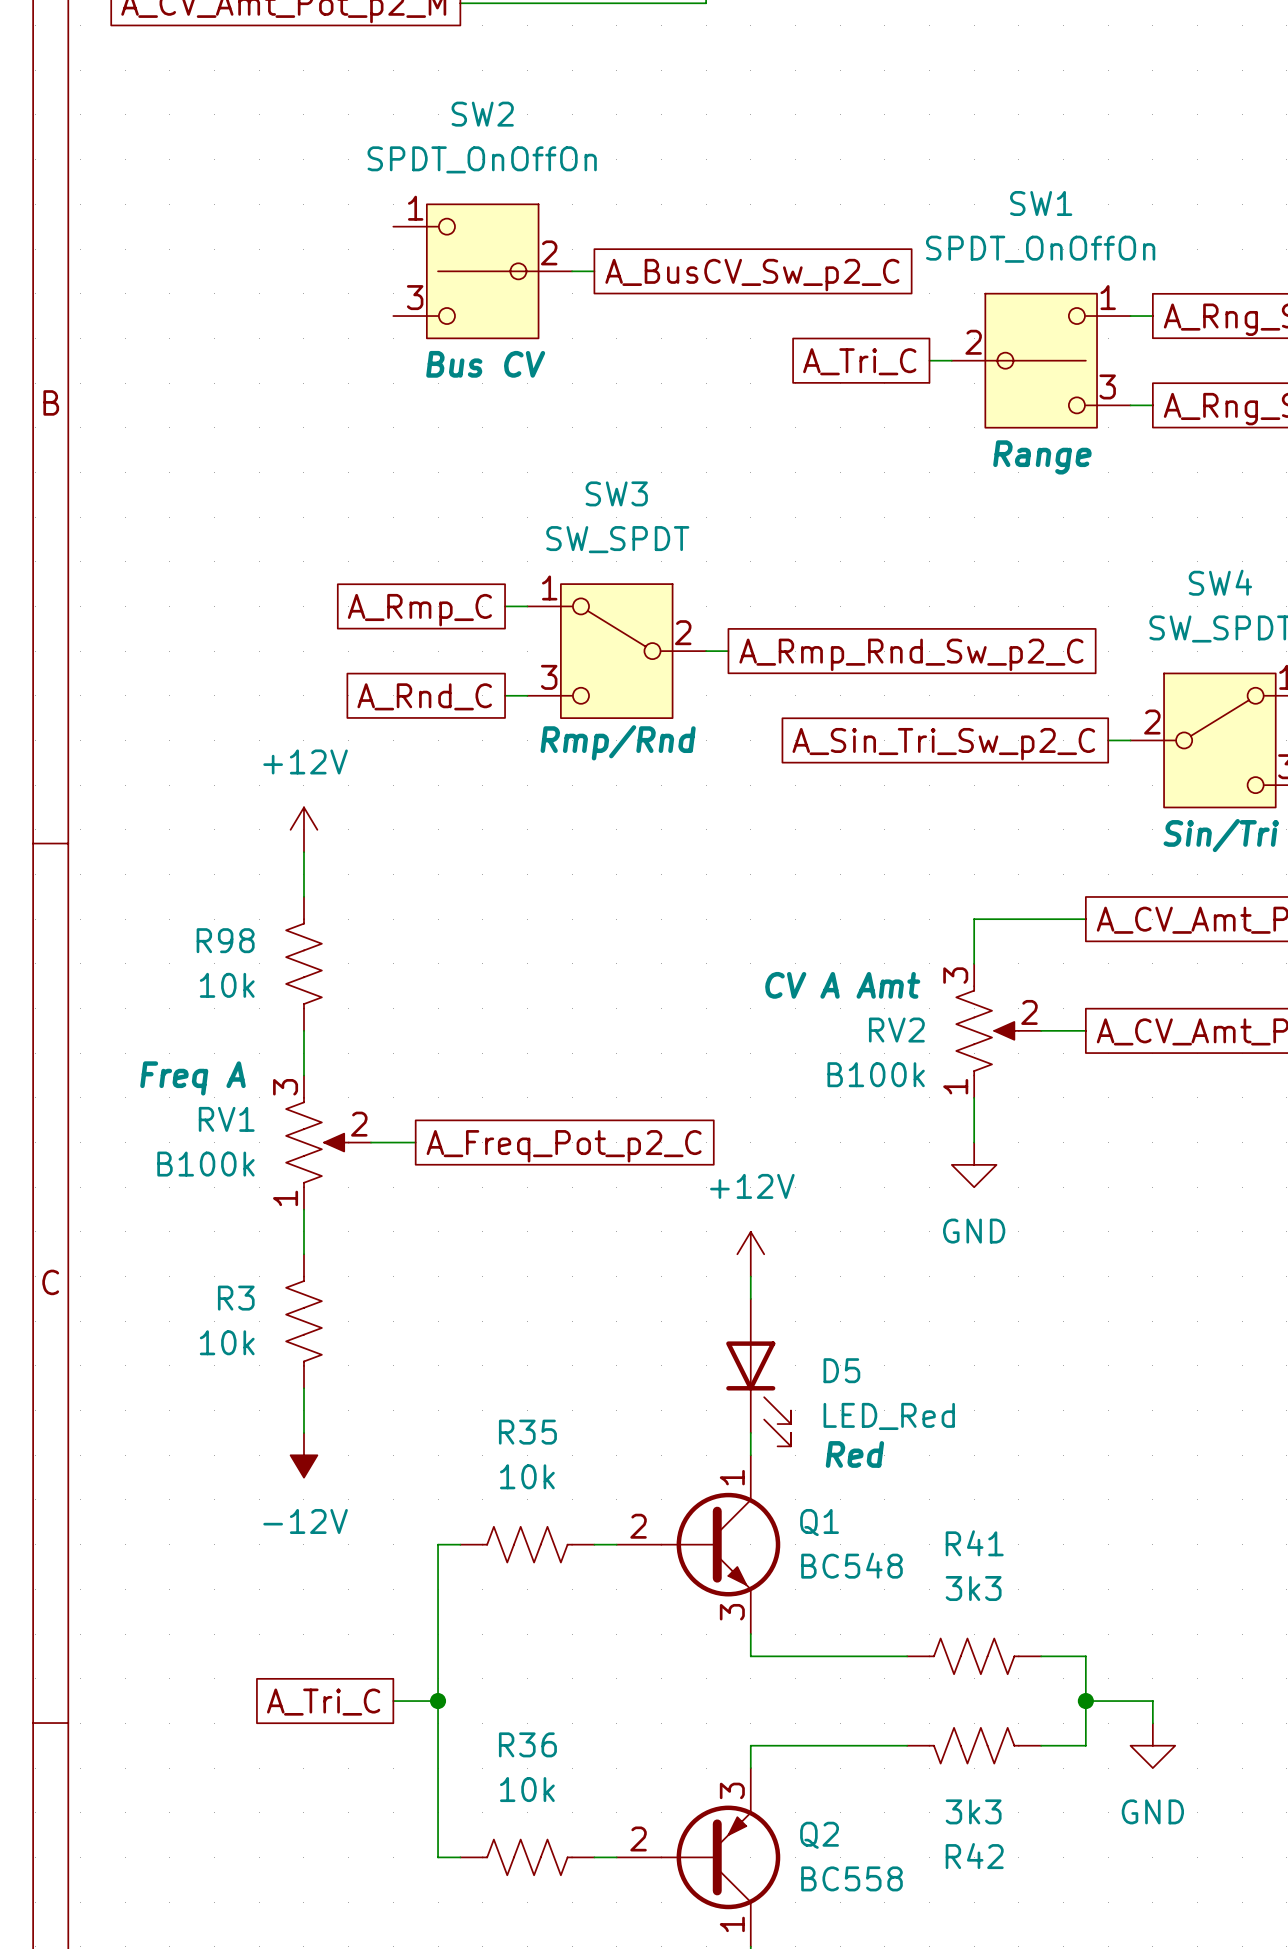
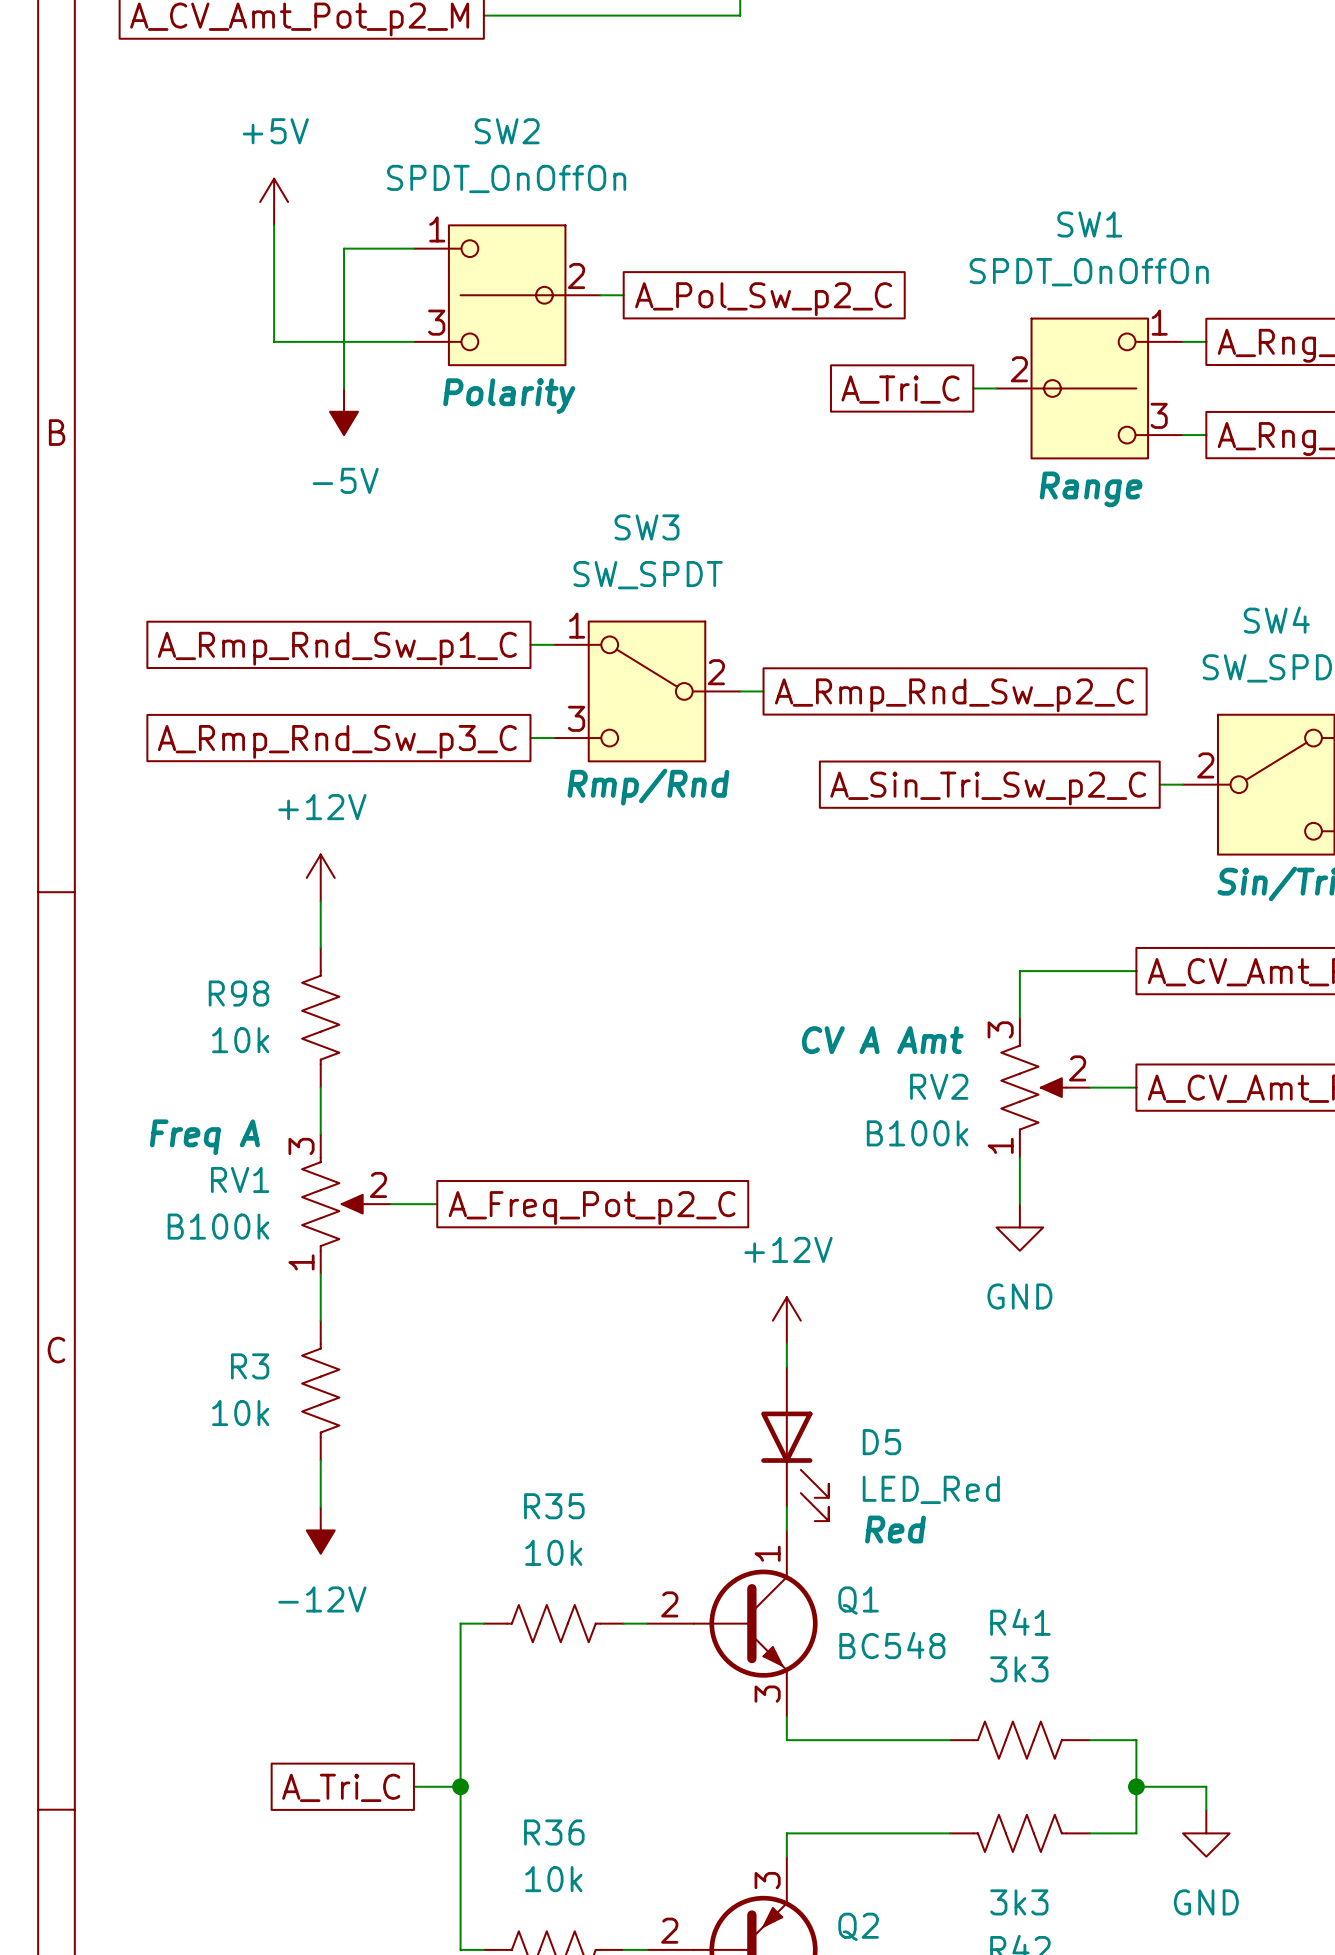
power symbol: none -> +5V (274, 202)
wire: none -> (274, 225) (274, 341) (413, 341)
wire: none -> (413, 248) (344, 248) (344, 388)
global label: A_BusCV_Sw_p2_C (752, 275) -> A_Pol_Sw_p2_C (763, 299)
SW2 text: Bus CV (485, 364) -> Polarity (509, 396)
power symbol: none -> -5V (344, 411)
global label: A_Rmp_C (419, 610) -> A_Rmp_Rnd_Sw_p1_C (337, 648)
global label: A_Rnd_C (424, 696) -> A_Rmp_Rnd_Sw_p3_C (337, 741)

